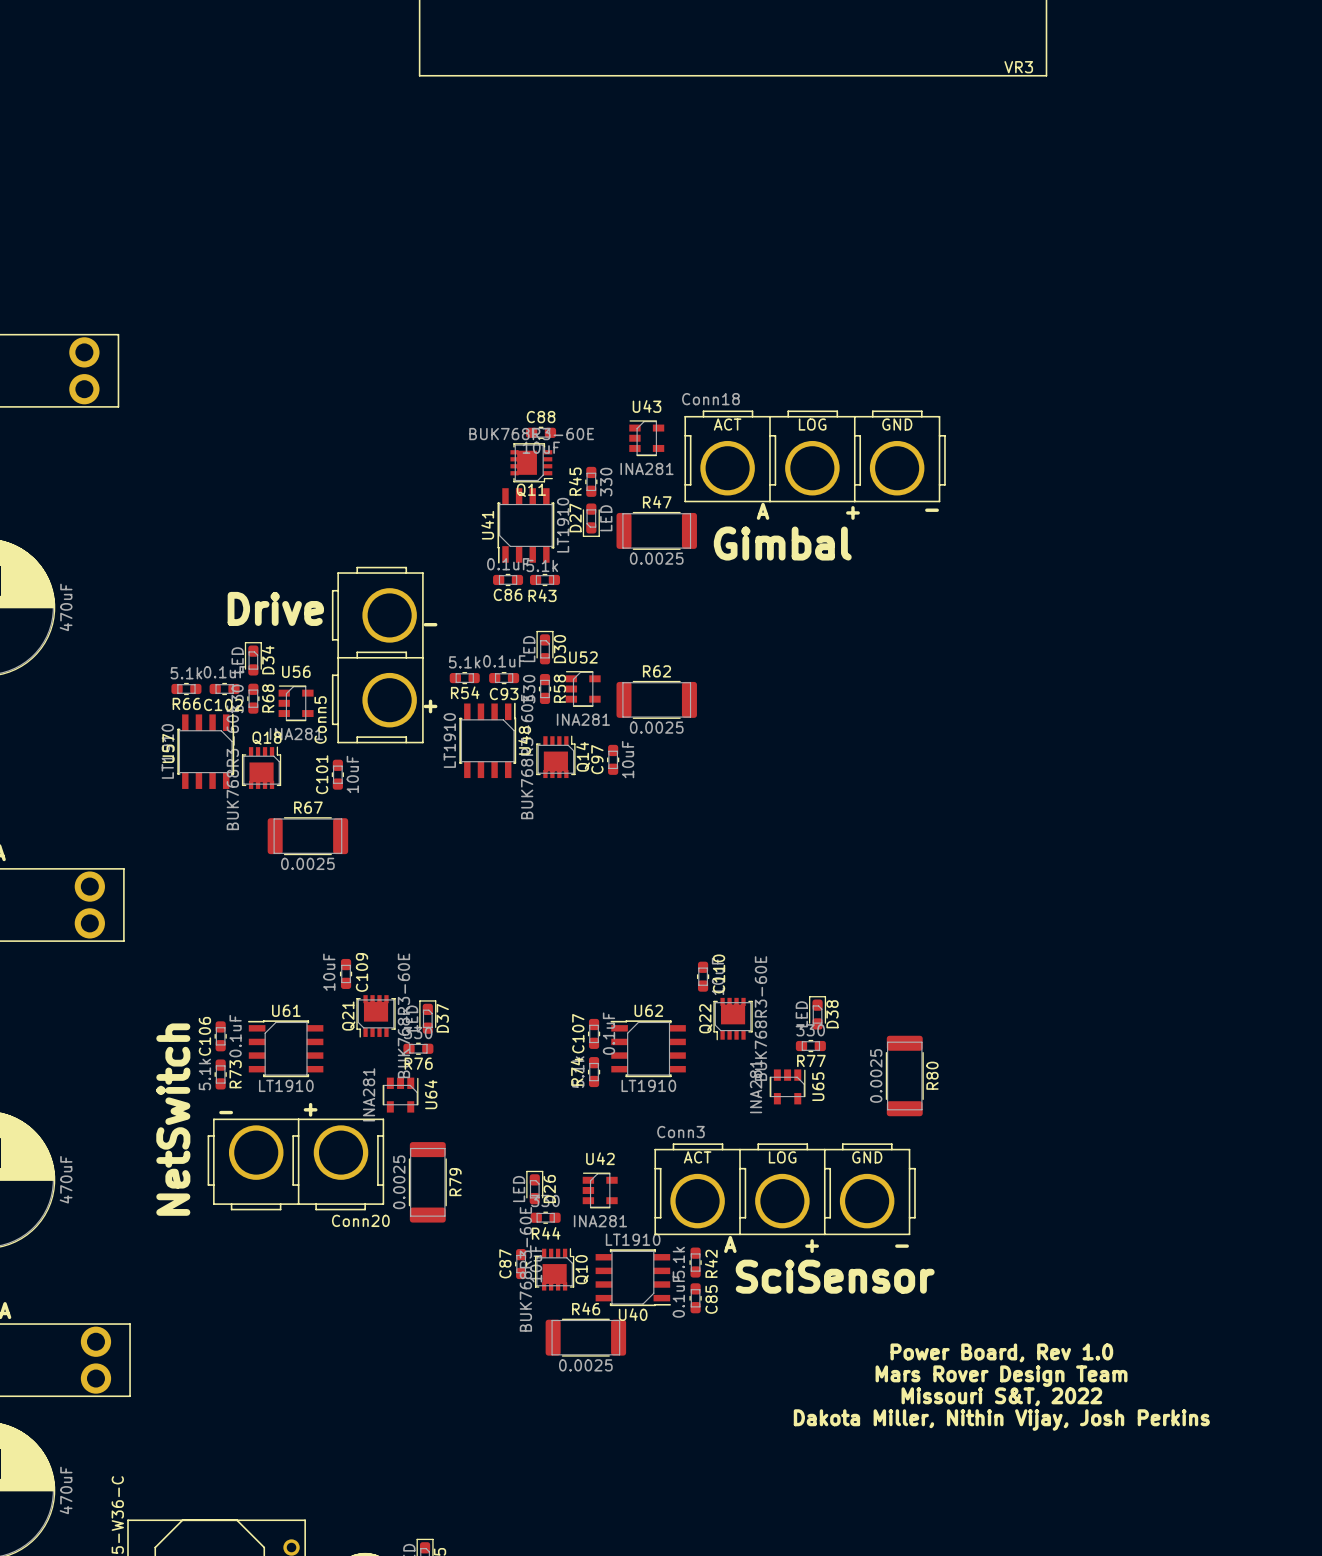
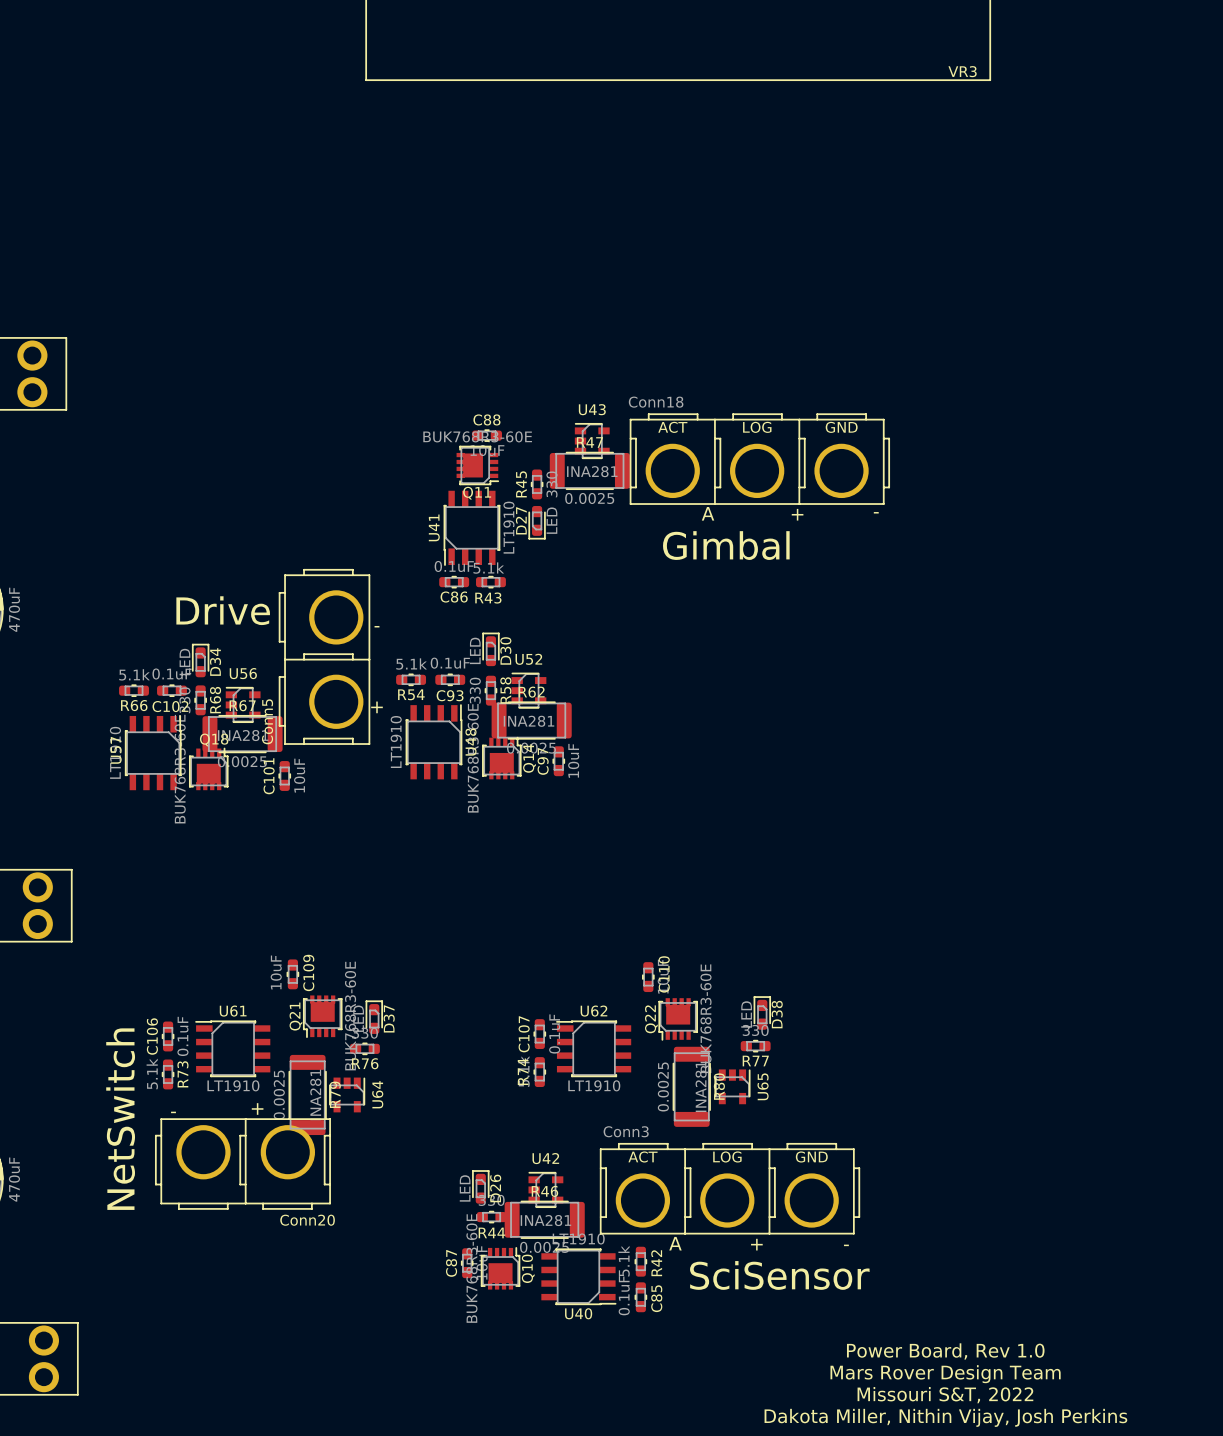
R47 position: (656, 530) -> (589, 470)
R62 position: (656, 699) -> (531, 720)
R67 position: (307, 836) -> (242, 734)
R80 position: (904, 1075) -> (691, 1086)
R79 position: (427, 1182) -> (307, 1094)
R46 position: (585, 1337) -> (544, 1219)

